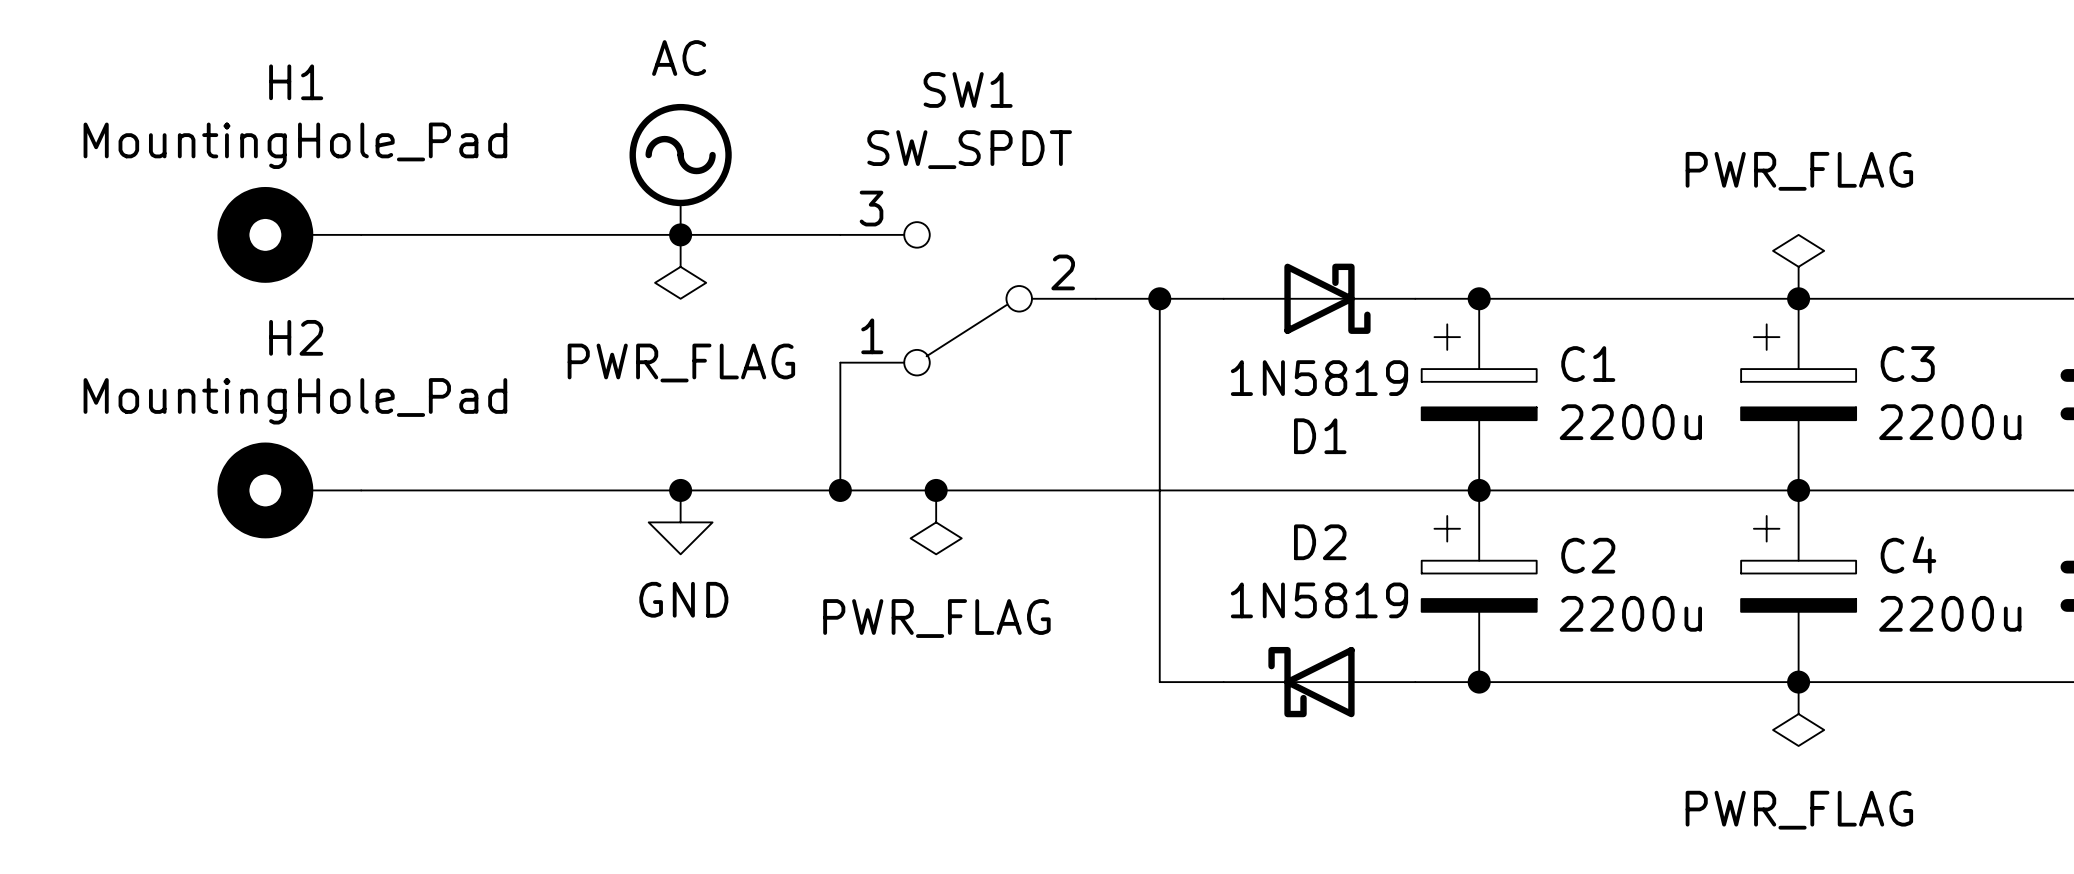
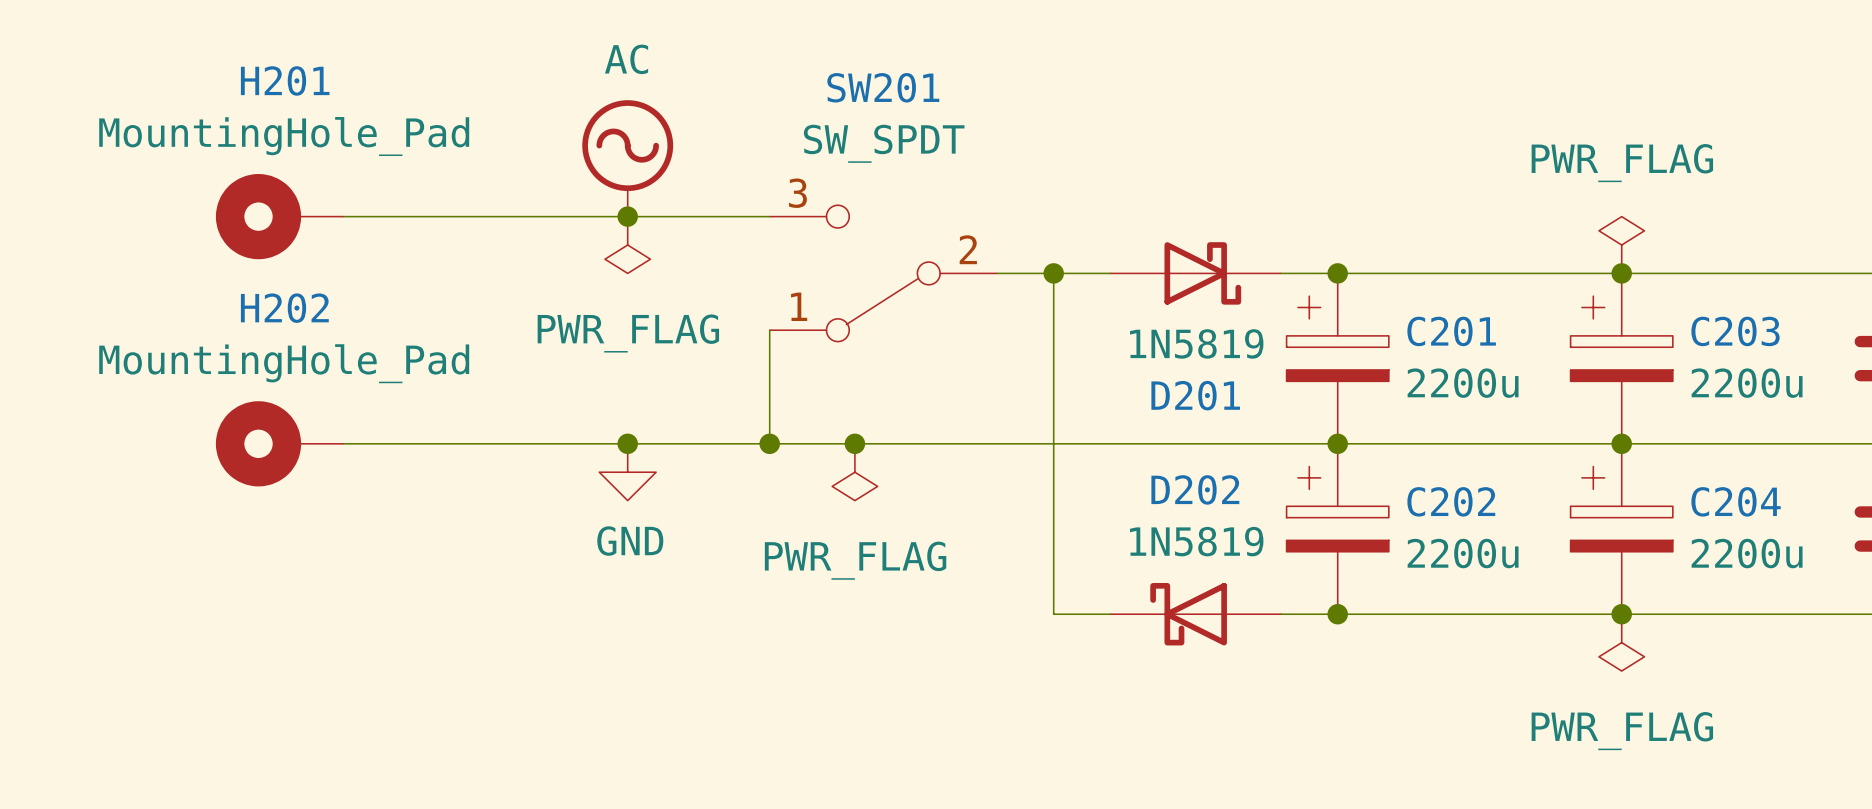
H1 name: H1 (296, 82) -> H201 (285, 80)
SW1 name: SW1 (968, 89) -> SW201 (883, 87)
H2 name: H2 (296, 337) -> H202 (284, 308)
C1 name: C1 (1588, 364) -> C201 (1451, 331)
C3 name: C3 (1907, 364) -> C203 (1735, 331)
D1 name: D1 (1320, 436) -> D201 (1195, 395)
D2 name: D2 (1320, 542) -> D202 (1195, 489)
C4 name: C4 (1908, 554) -> C204 (1736, 501)
C2 name: C2 (1588, 555) -> C202 (1451, 501)

